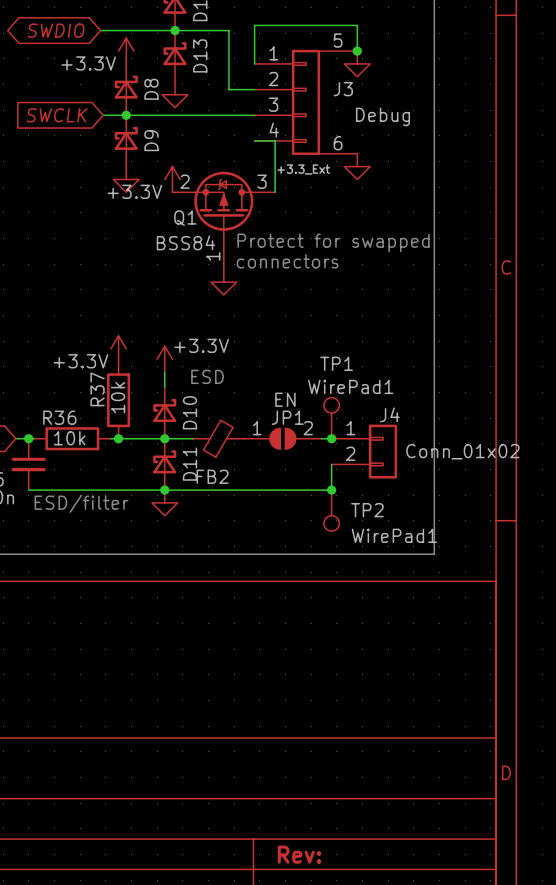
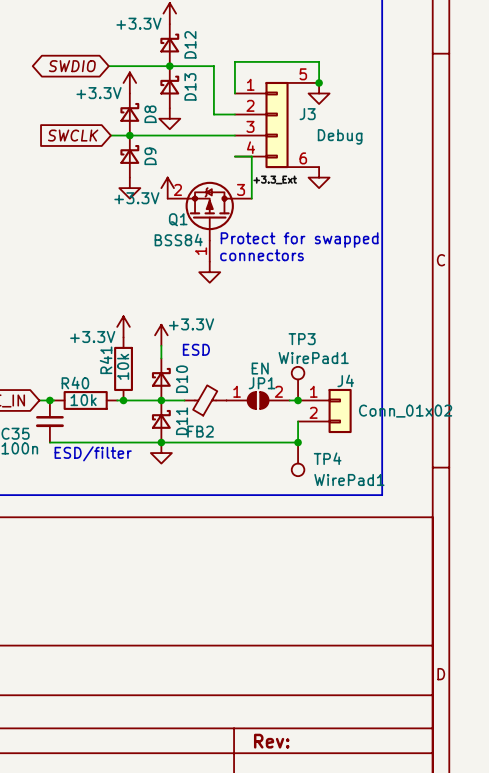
TP1 name: TP1 (336, 363) -> TP3 (302, 339)
R37 name: R37 (97, 389) -> R41 (106, 360)
R36 name: R36 (59, 417) -> R40 (75, 383)
TP2 name: TP2 (367, 510) -> TP4 (327, 458)

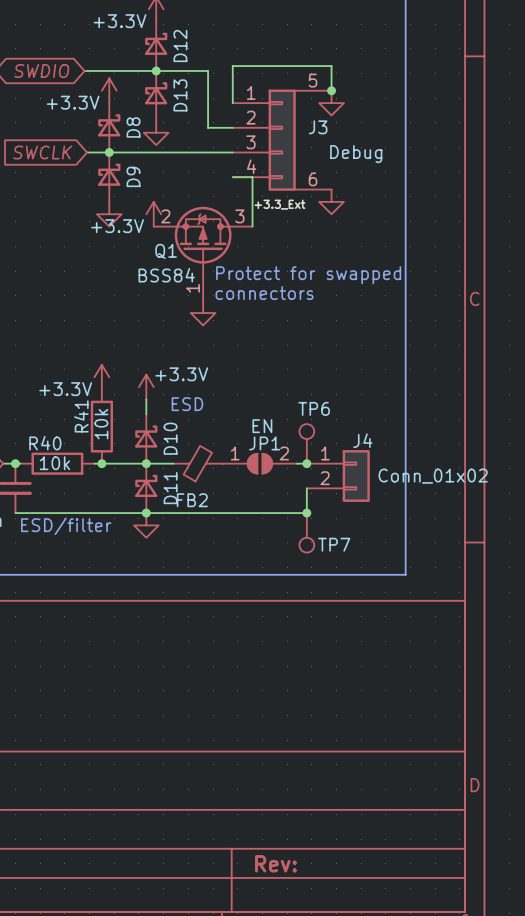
TP3 name: TP3 (302, 339) -> TP6 (314, 408)
TP3 value: WirePad1 (313, 358) -> none
TP4 name: TP4 (327, 458) -> TP7 (334, 544)
TP4 value: WirePad1 (349, 479) -> none

